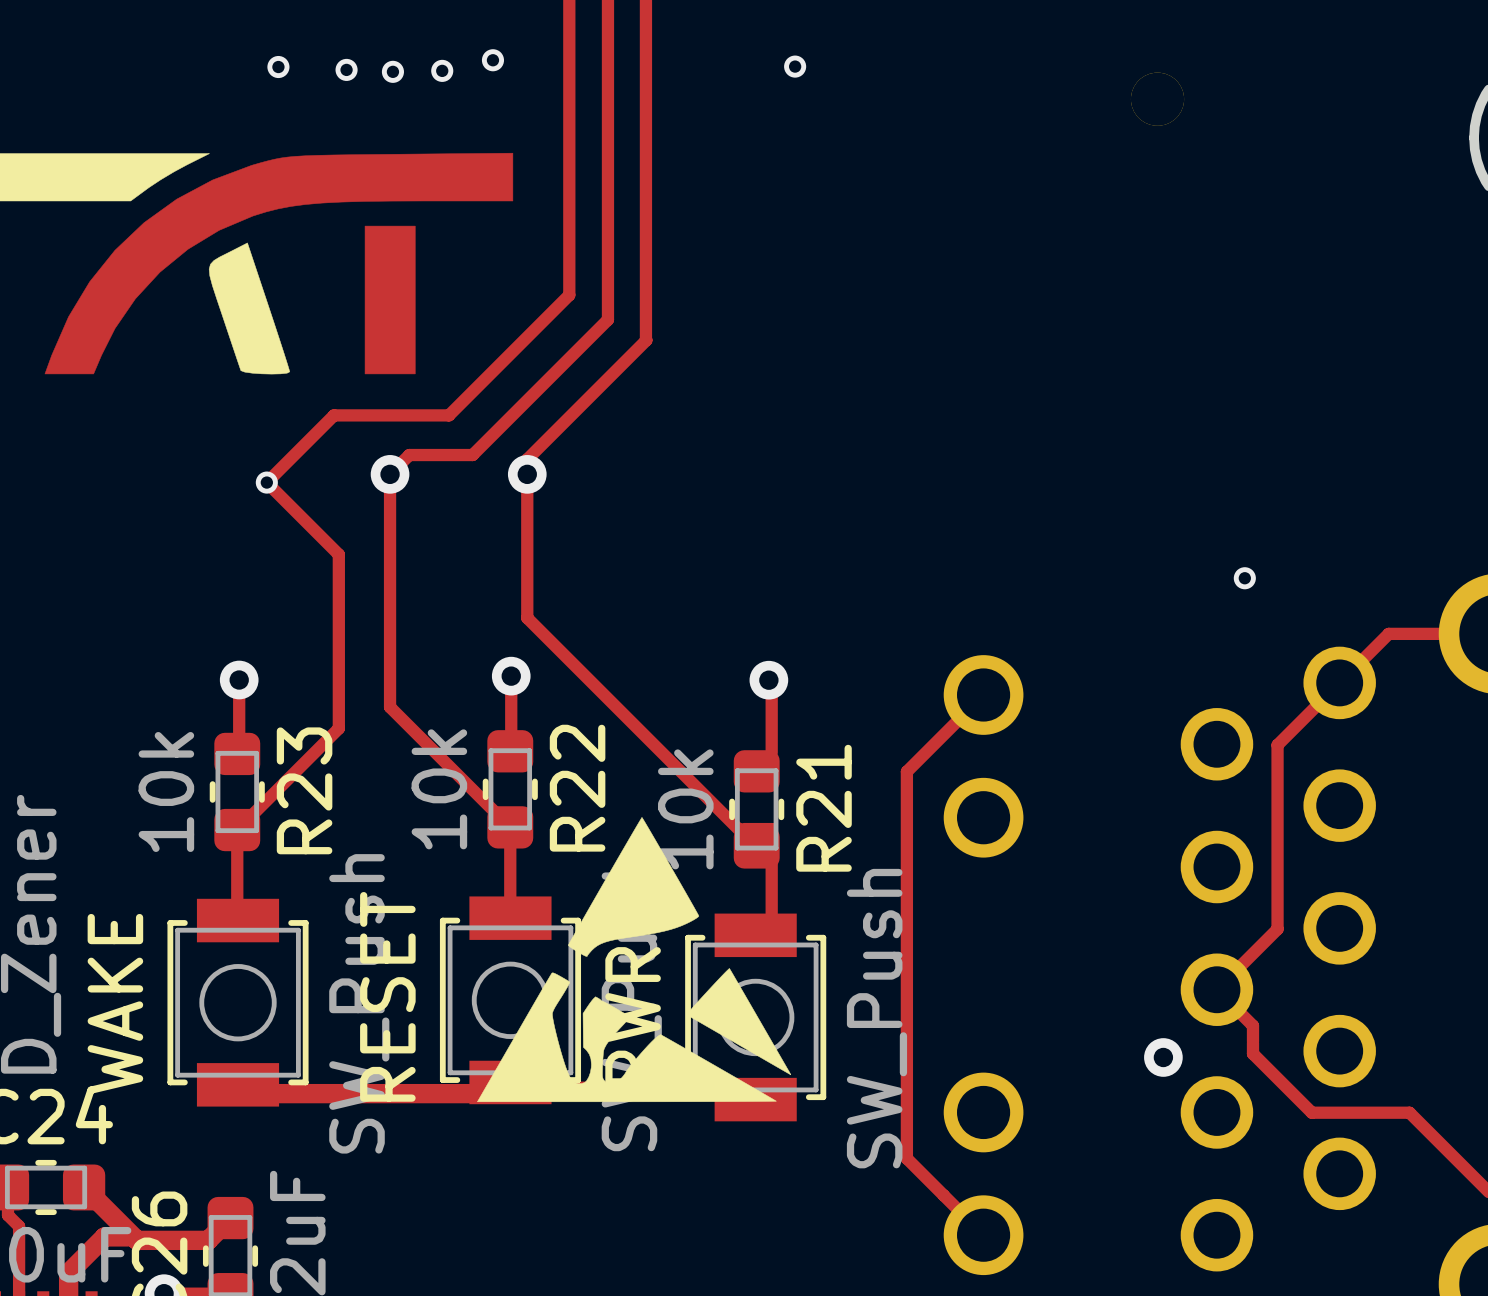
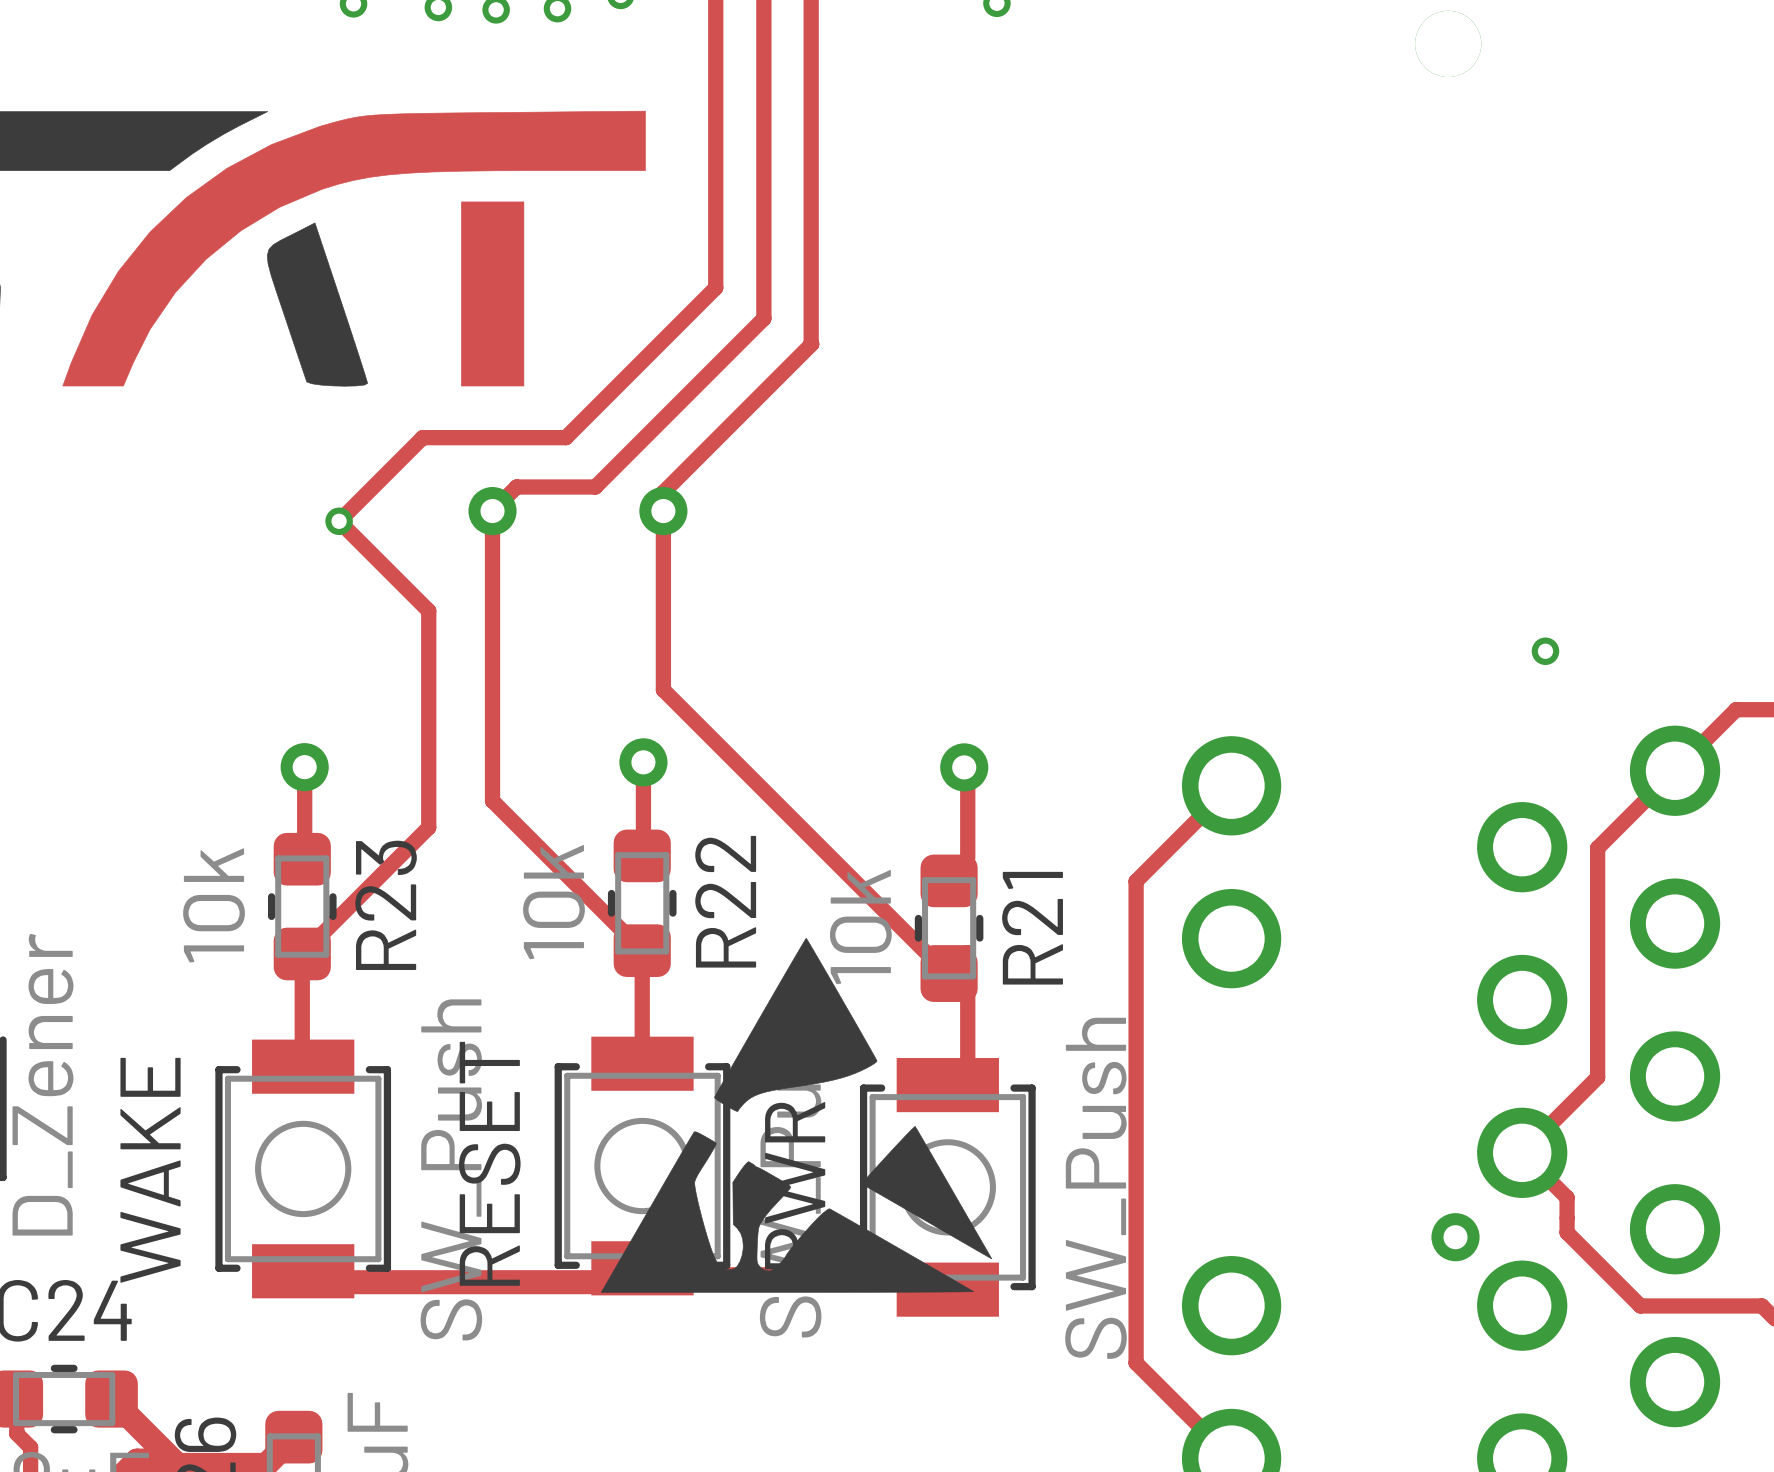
via position: (1244, 578) -> (1545, 651)

